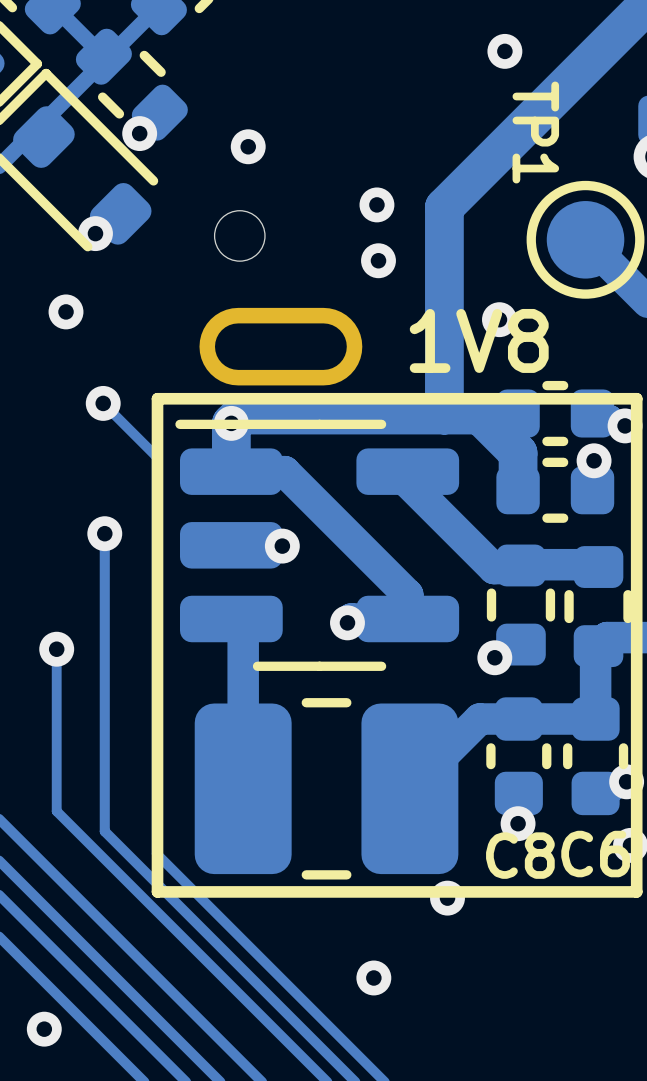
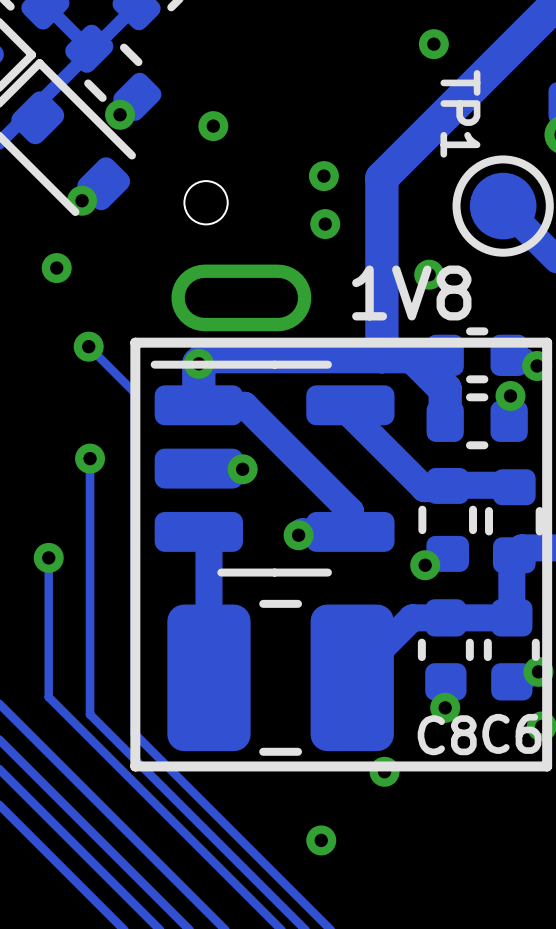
via: (44, 1029) -> none

